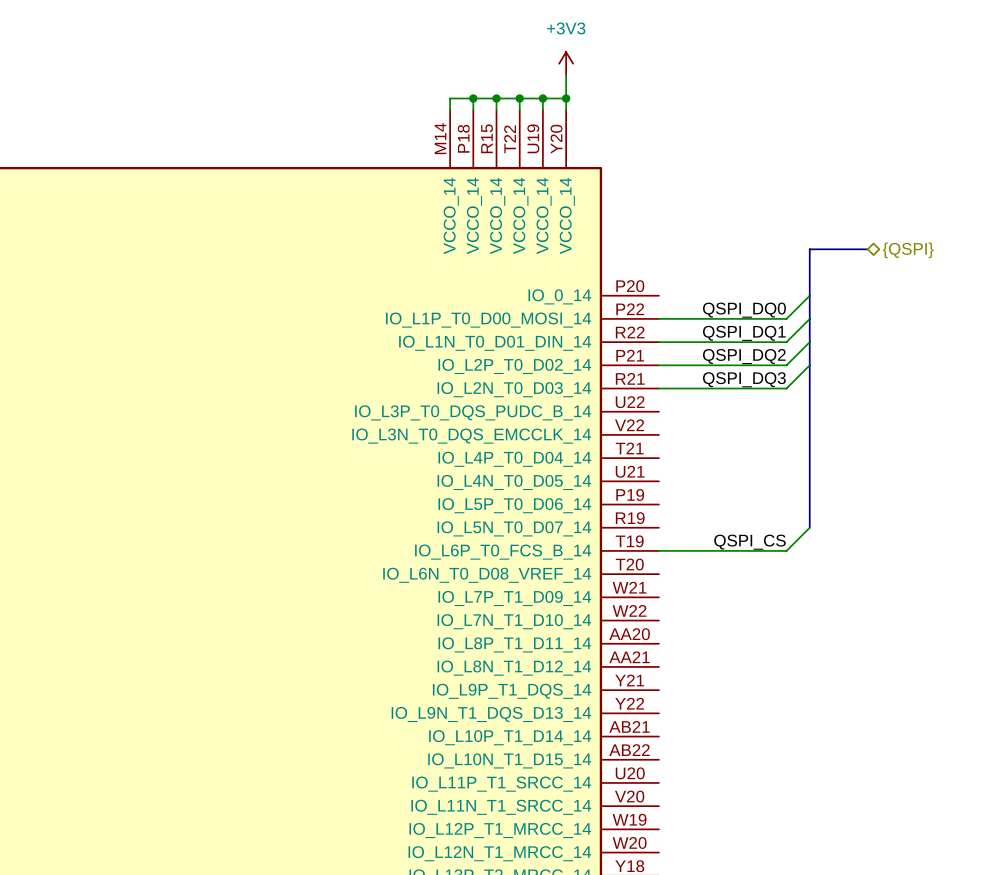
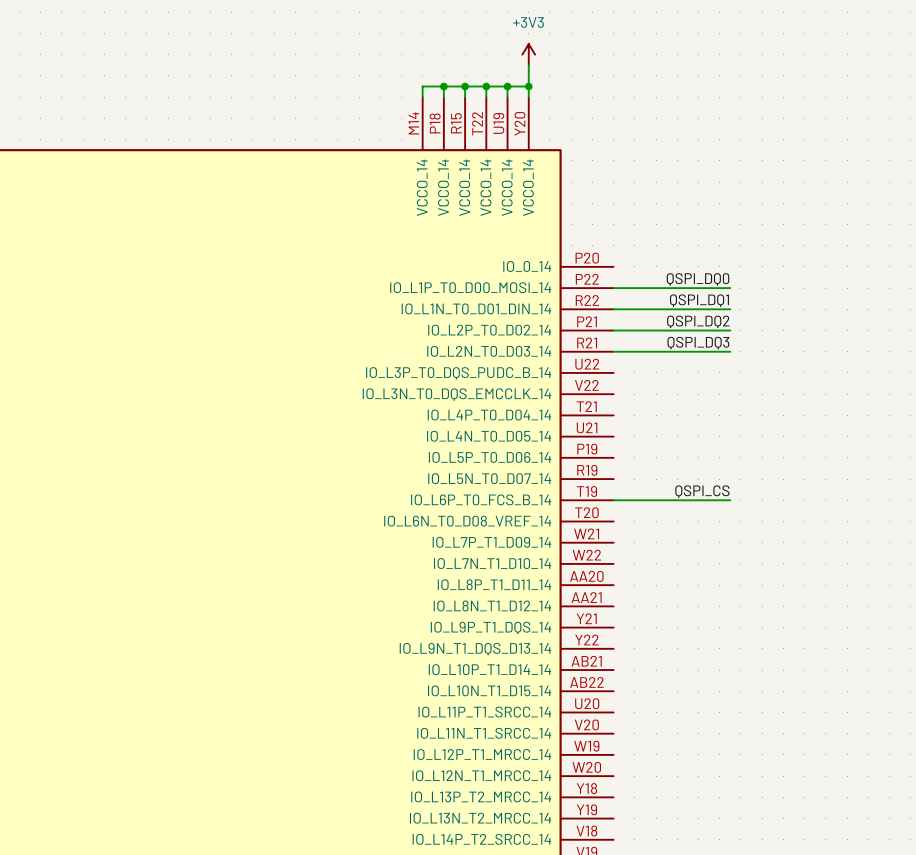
bus: (867, 249) (809, 249) (809, 527) -> none
hierarchical label: {QSPI} (908, 250) -> none
wire: (809, 295) (786, 318) -> none
wire: (809, 318) (786, 342) -> none
wire: (809, 342) (786, 365) -> none
wire: (809, 365) (786, 388) -> none
wire: (809, 527) (786, 550) -> none

